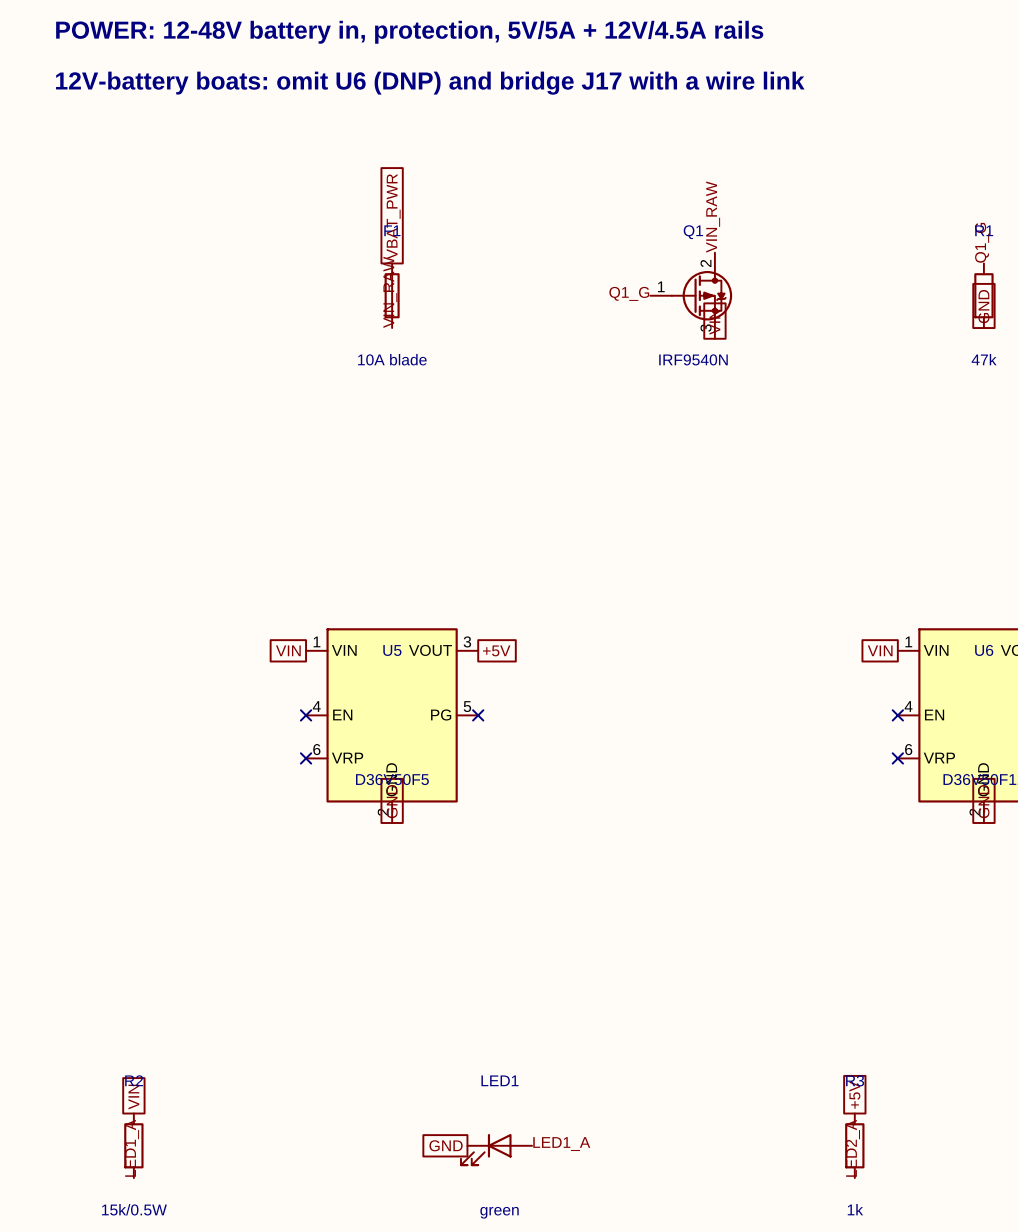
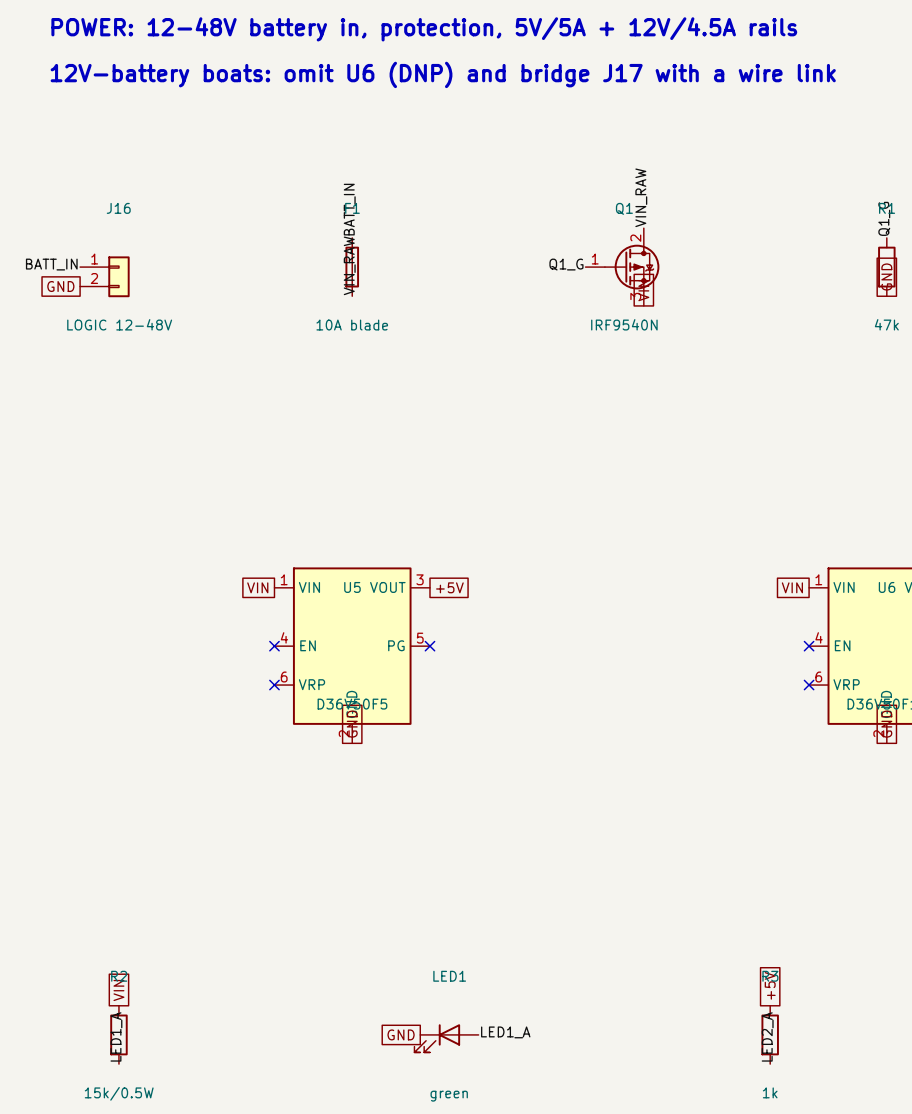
global label: VBAT_PWR (393, 216) -> none
label: none -> BATT_IN (349, 209)
label: none -> BATT_IN (51, 264)
J16: none -> LOGIC 12-48V (104, 276)
global label: none -> GND (60, 286)

